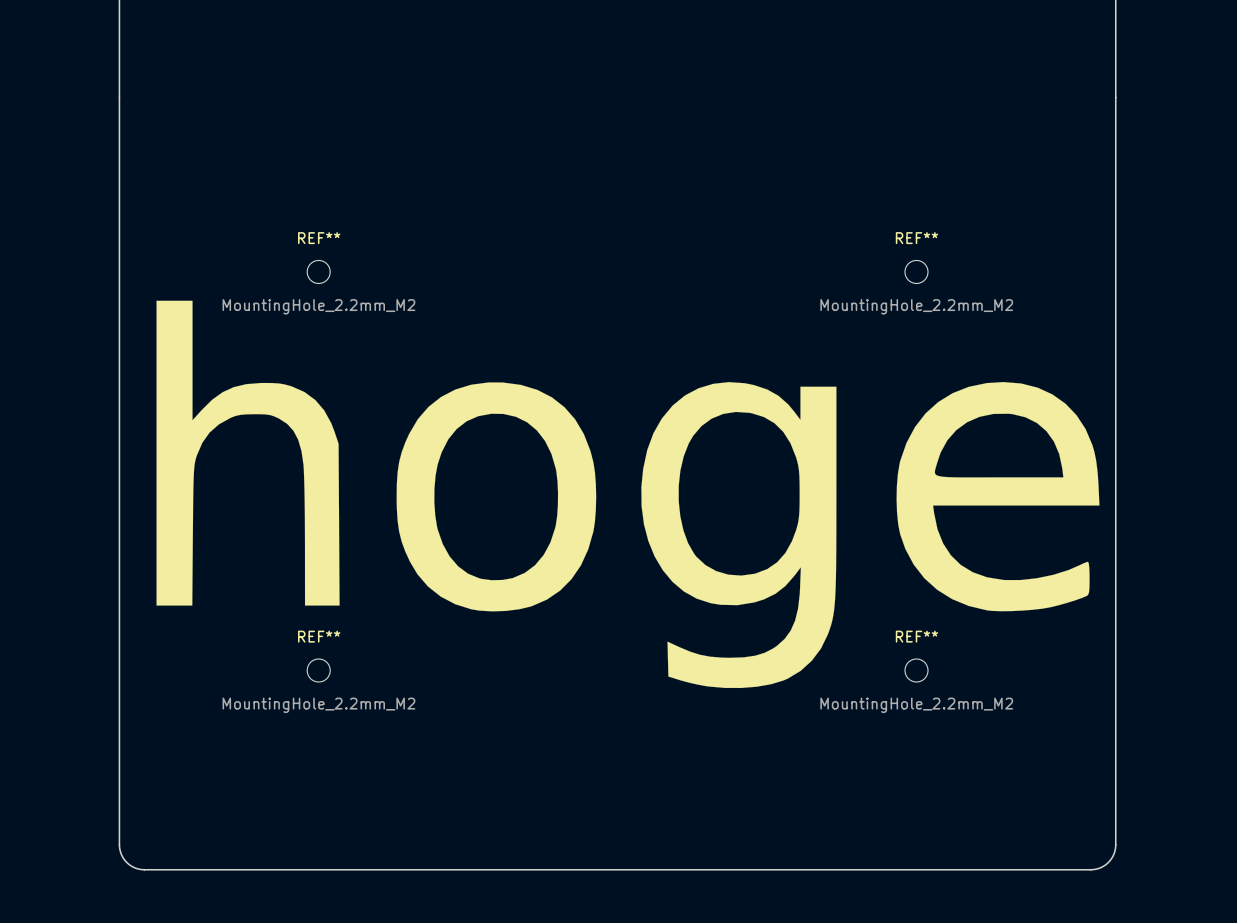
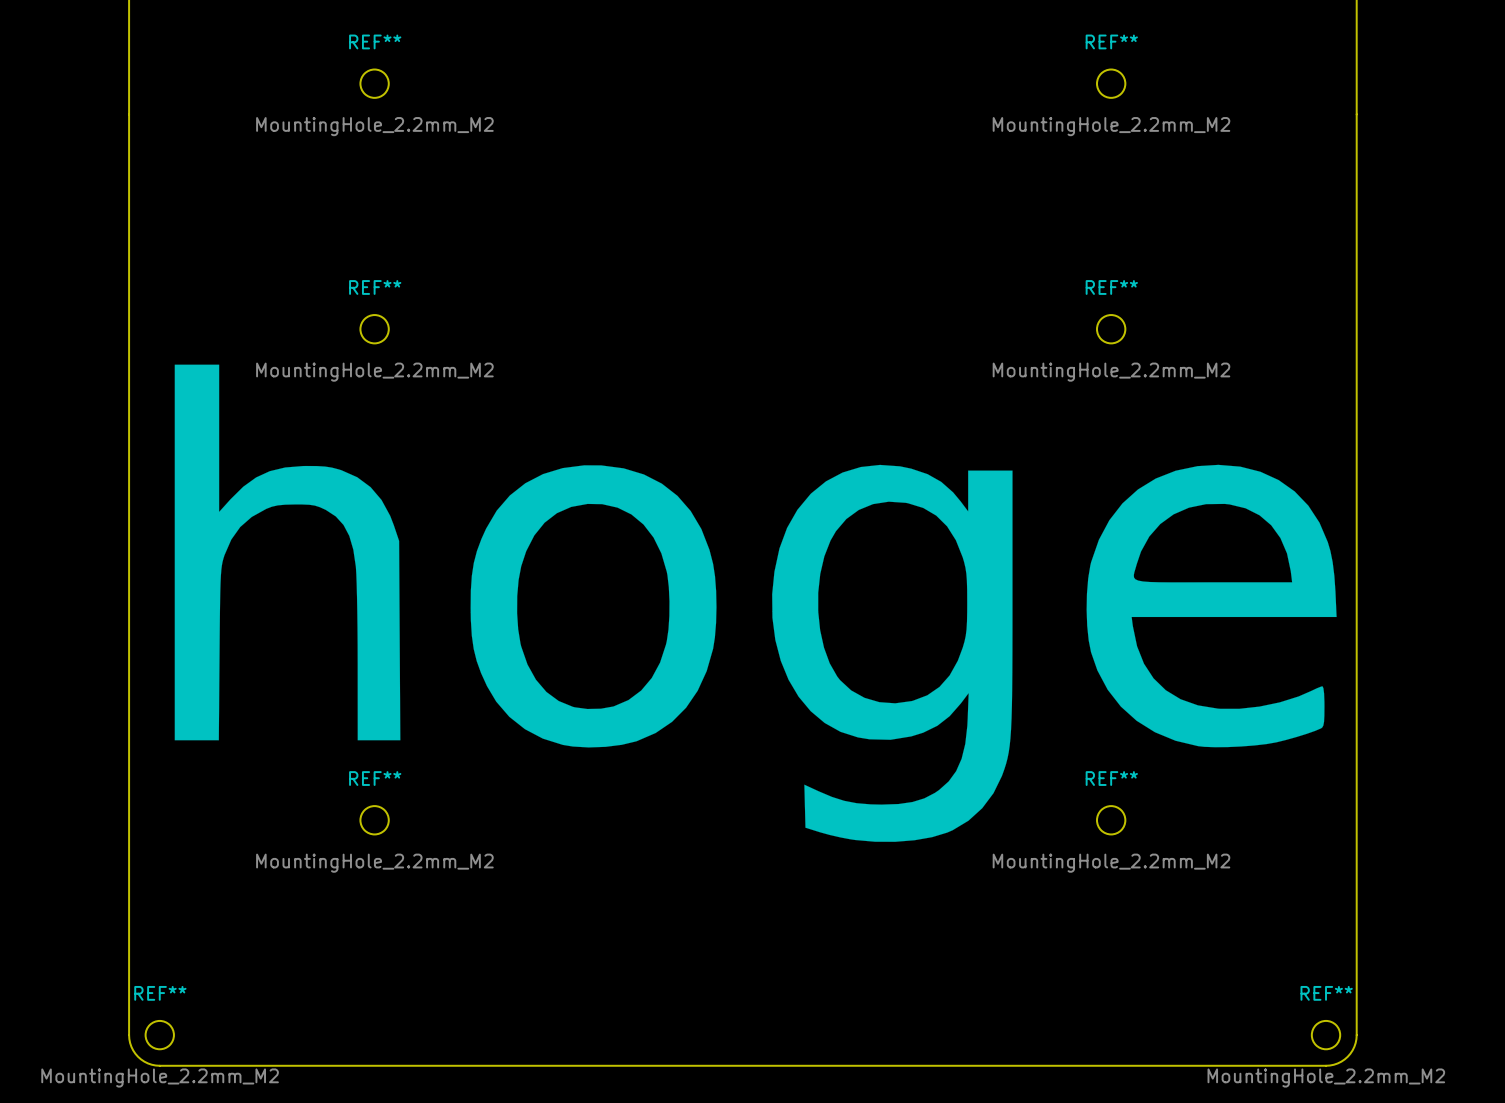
REF**: none -> MountingHole_2.2mm_M2 (374, 83)
REF**: none -> MountingHole_2.2mm_M2 (1111, 83)
REF**: none -> MountingHole_2.2mm_M2 (159, 1035)
REF**: none -> MountingHole_2.2mm_M2 (1326, 1035)

